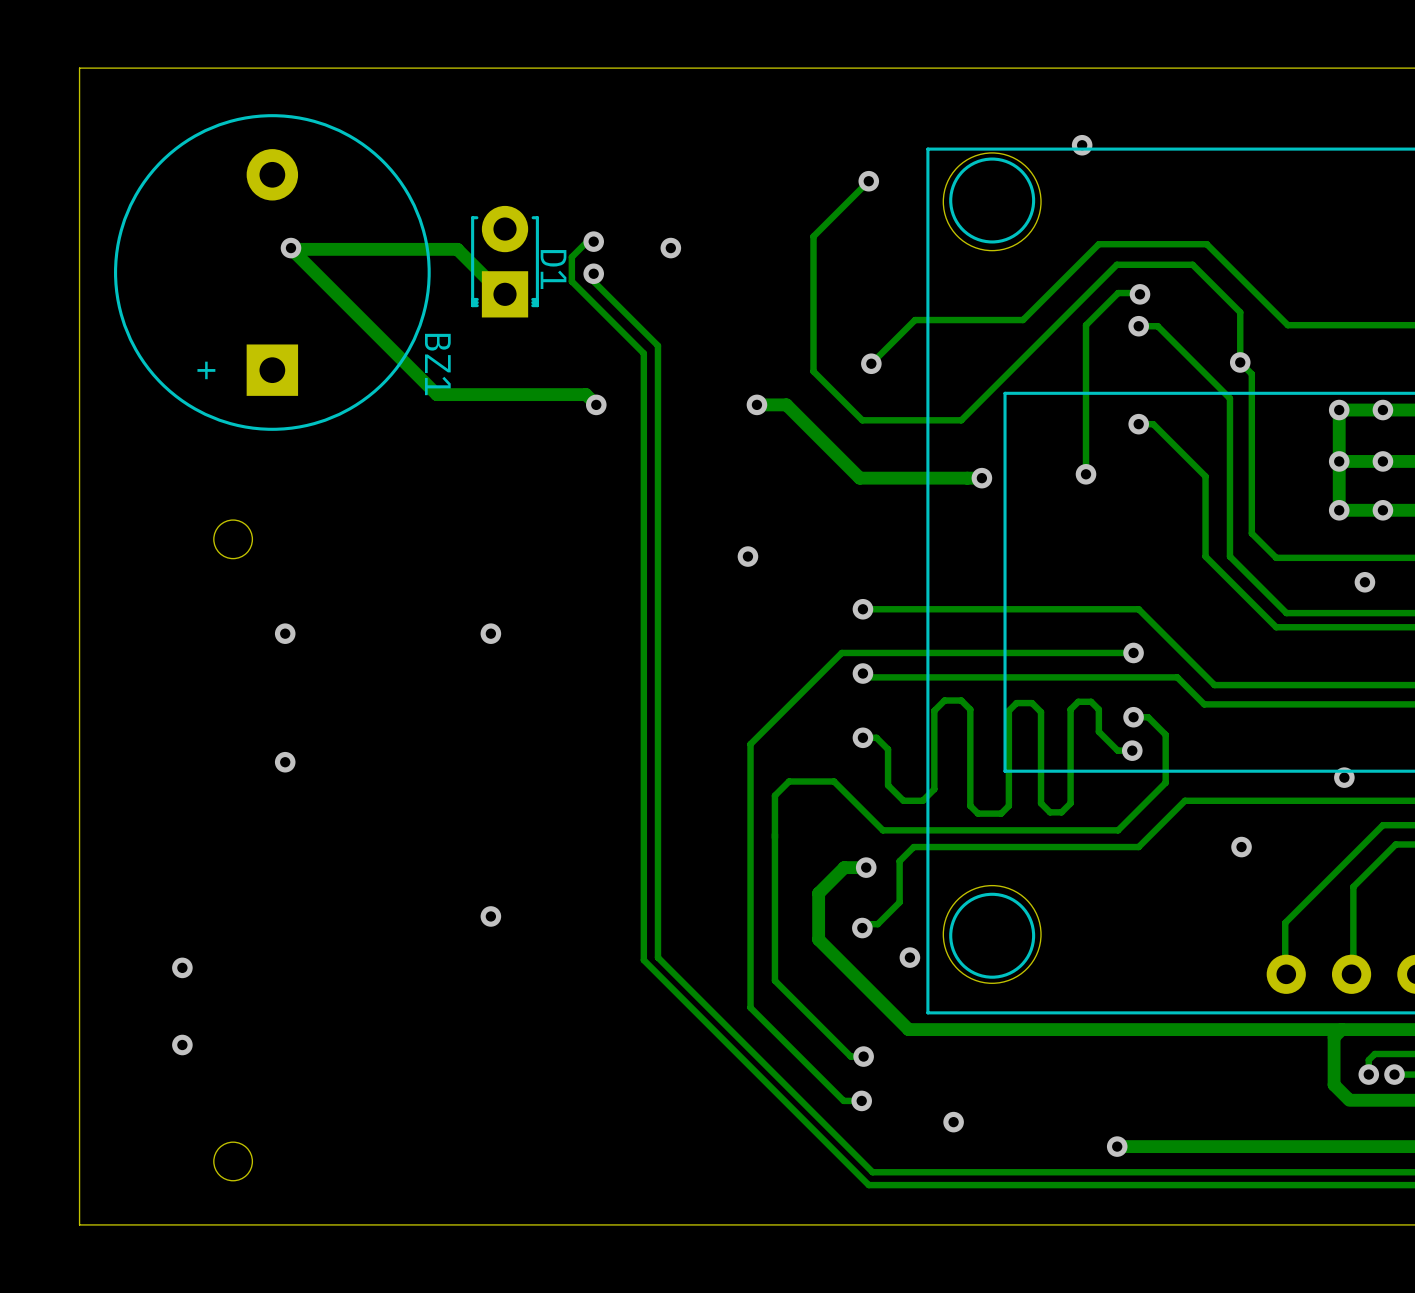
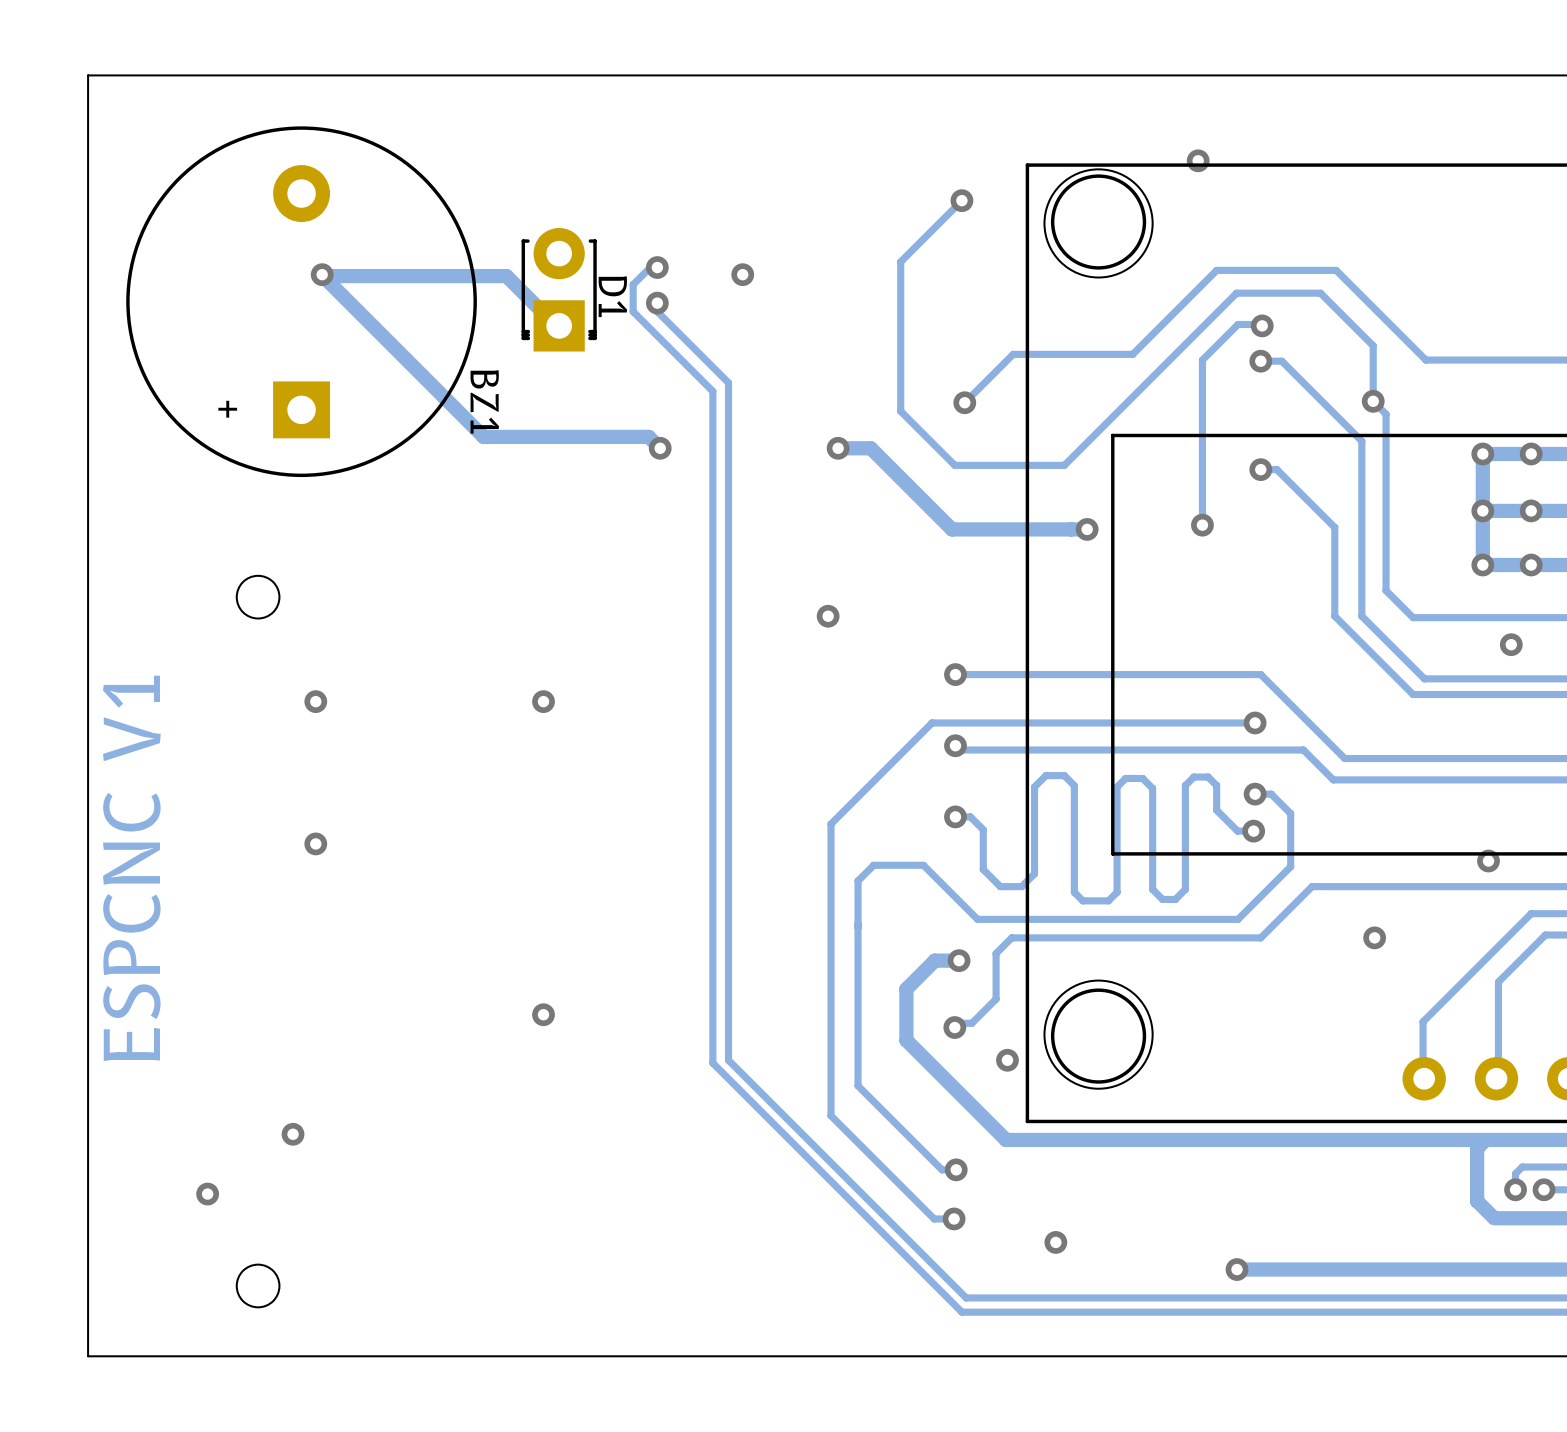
text: none -> ESPCNC V1 (131, 868)
via: (182, 967) -> none
via: none -> (293, 1134)
via position: (182, 1045) -> (207, 1194)

